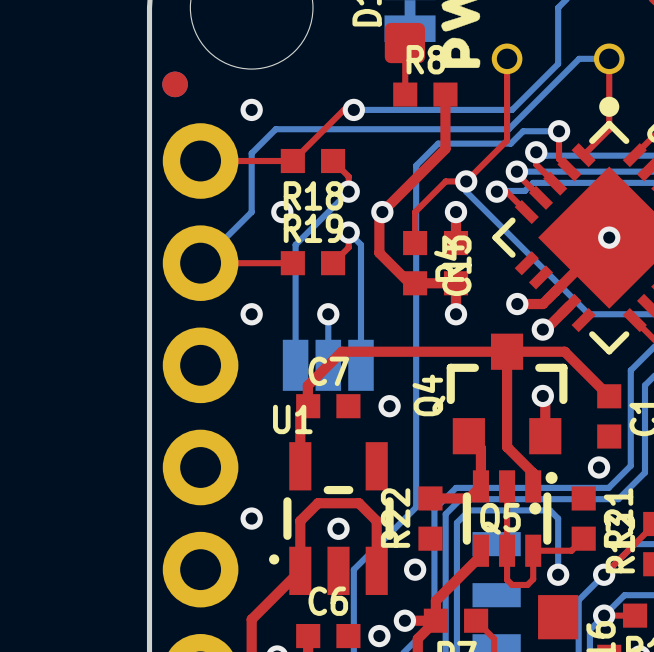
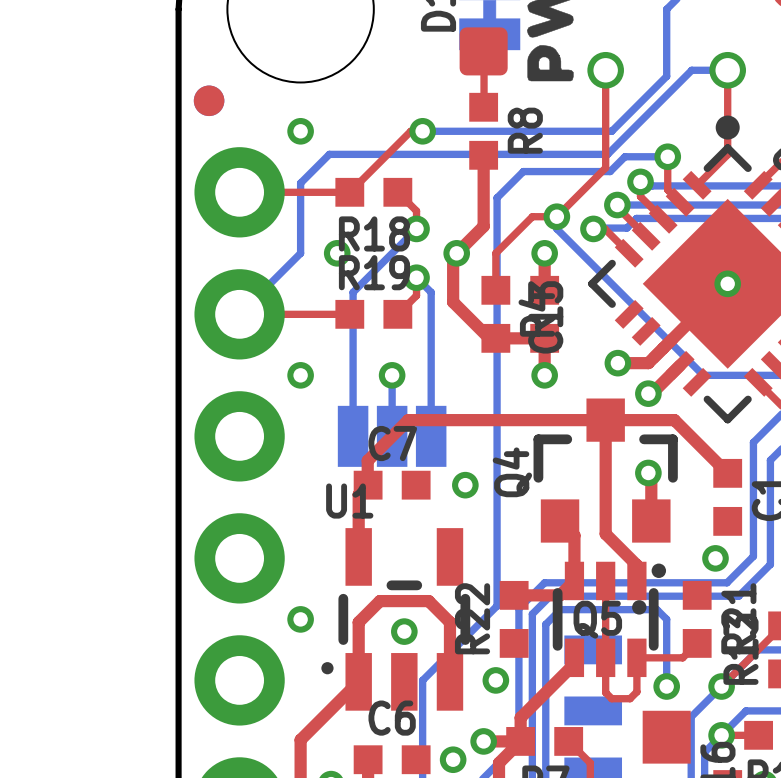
R8 rotation: 0° (425, 94) -> 90° clockwise (483, 131)
top track: (445, 94) (445, 148) (404, 189) -> (483, 155) (483, 226)

